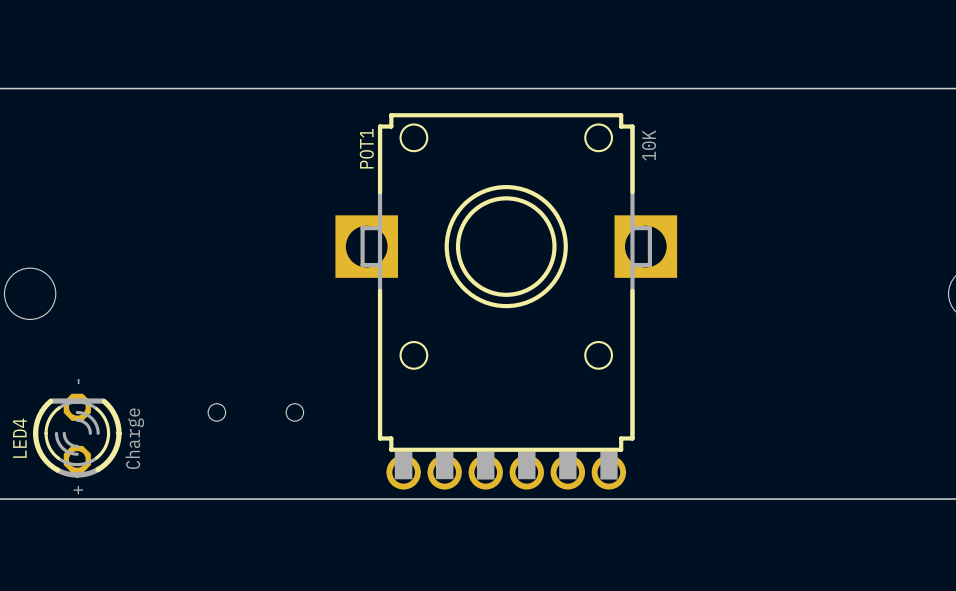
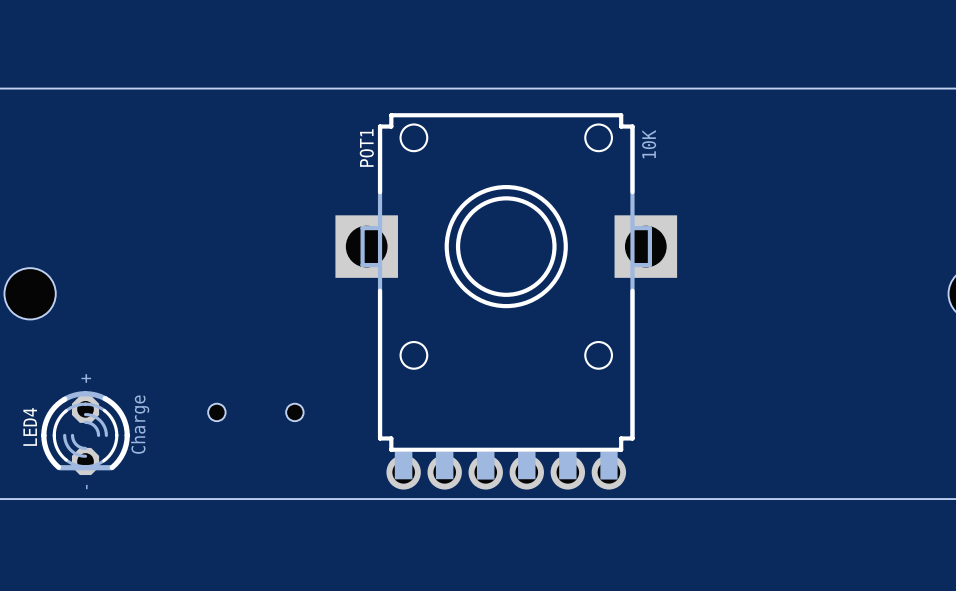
LED4 rotation: 0° (77, 435) -> 180° (85, 433)

